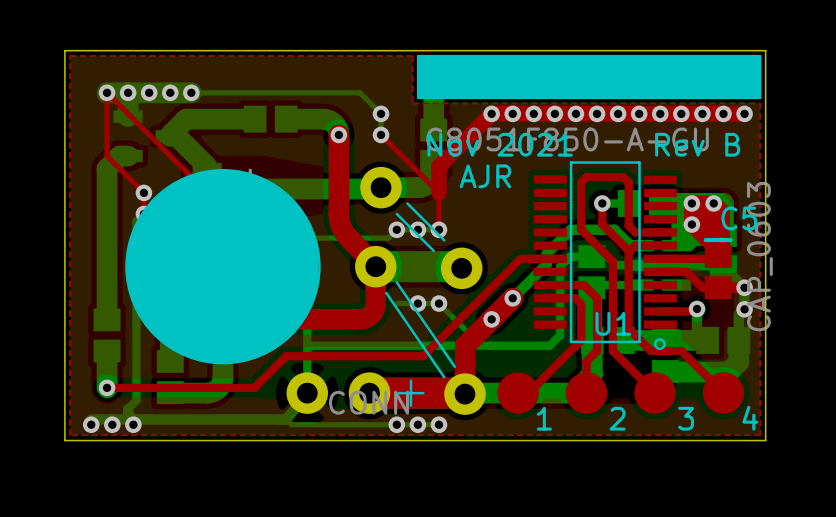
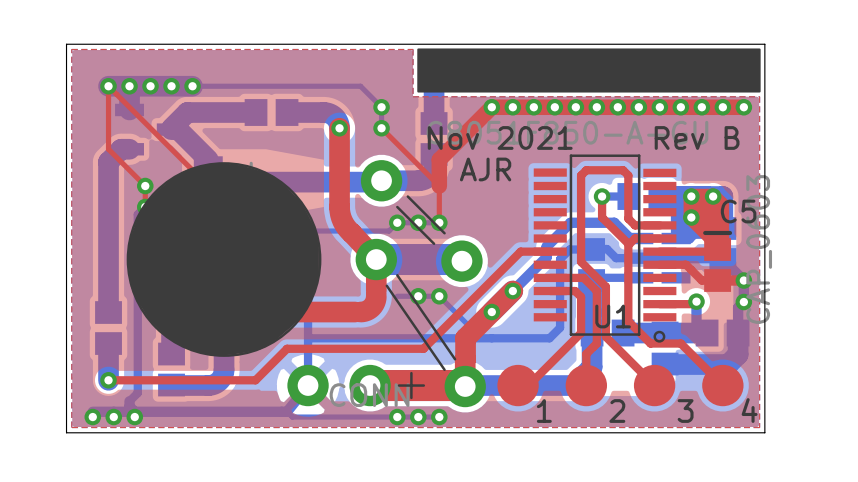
top track: (581, 229) (612, 261) (612, 350) -> (581, 222) (581, 261) (605, 286) (605, 336) (612, 343)

